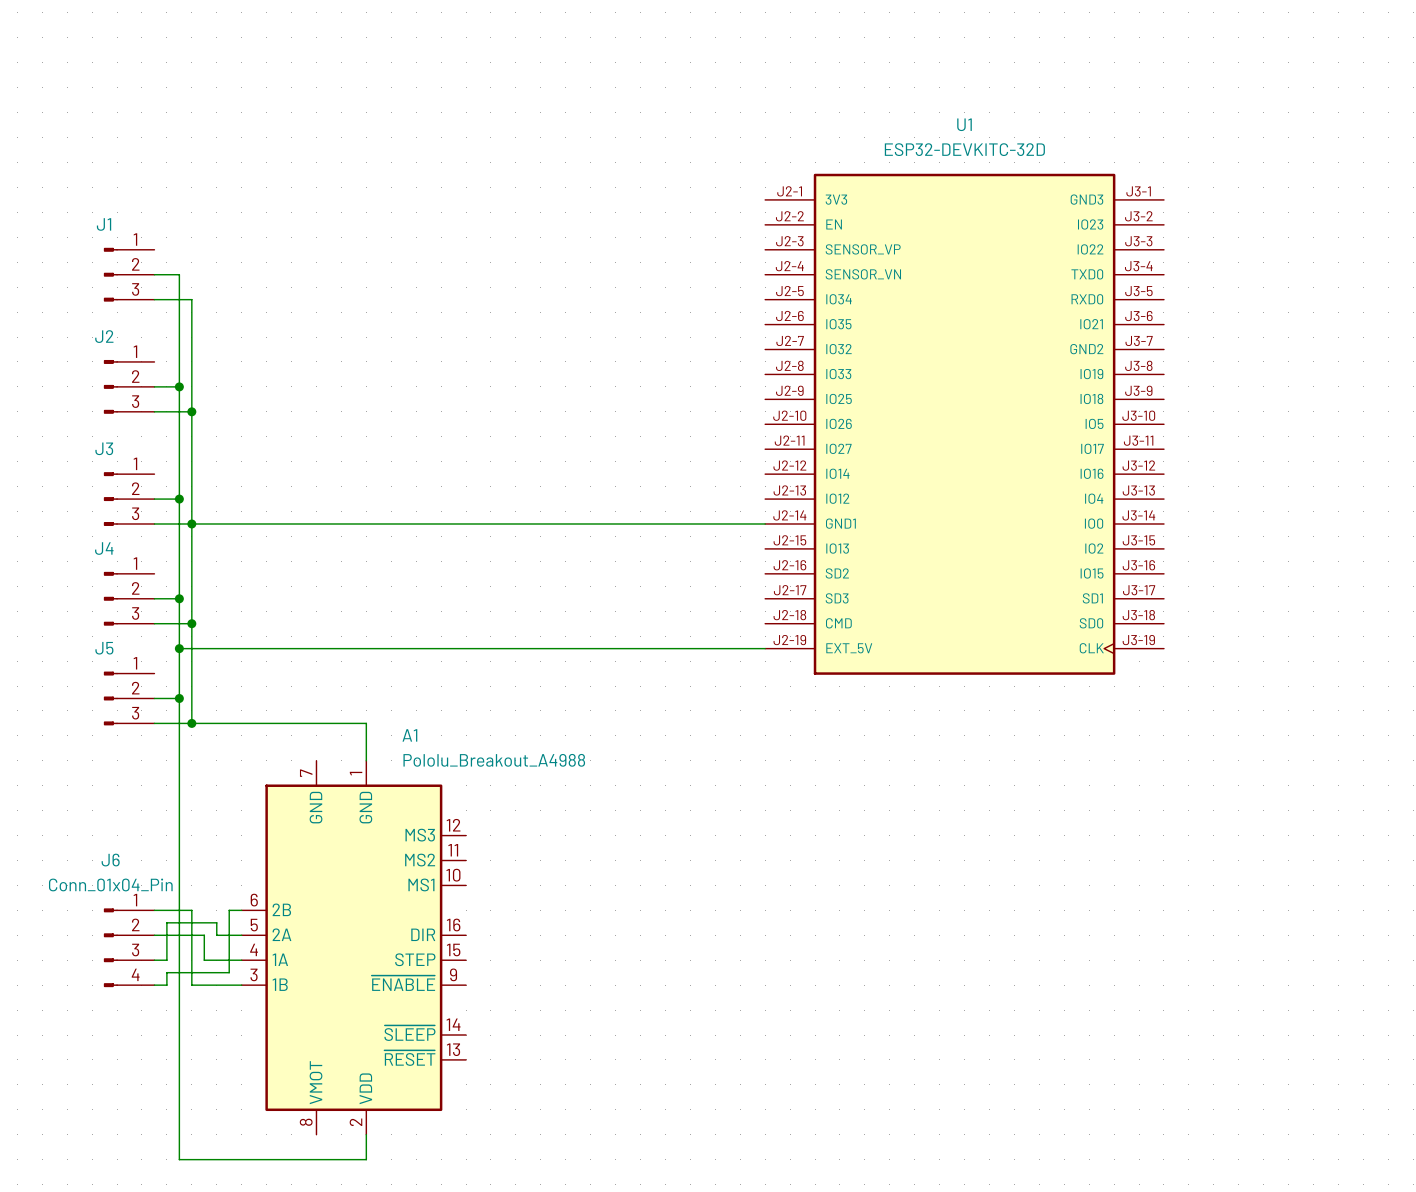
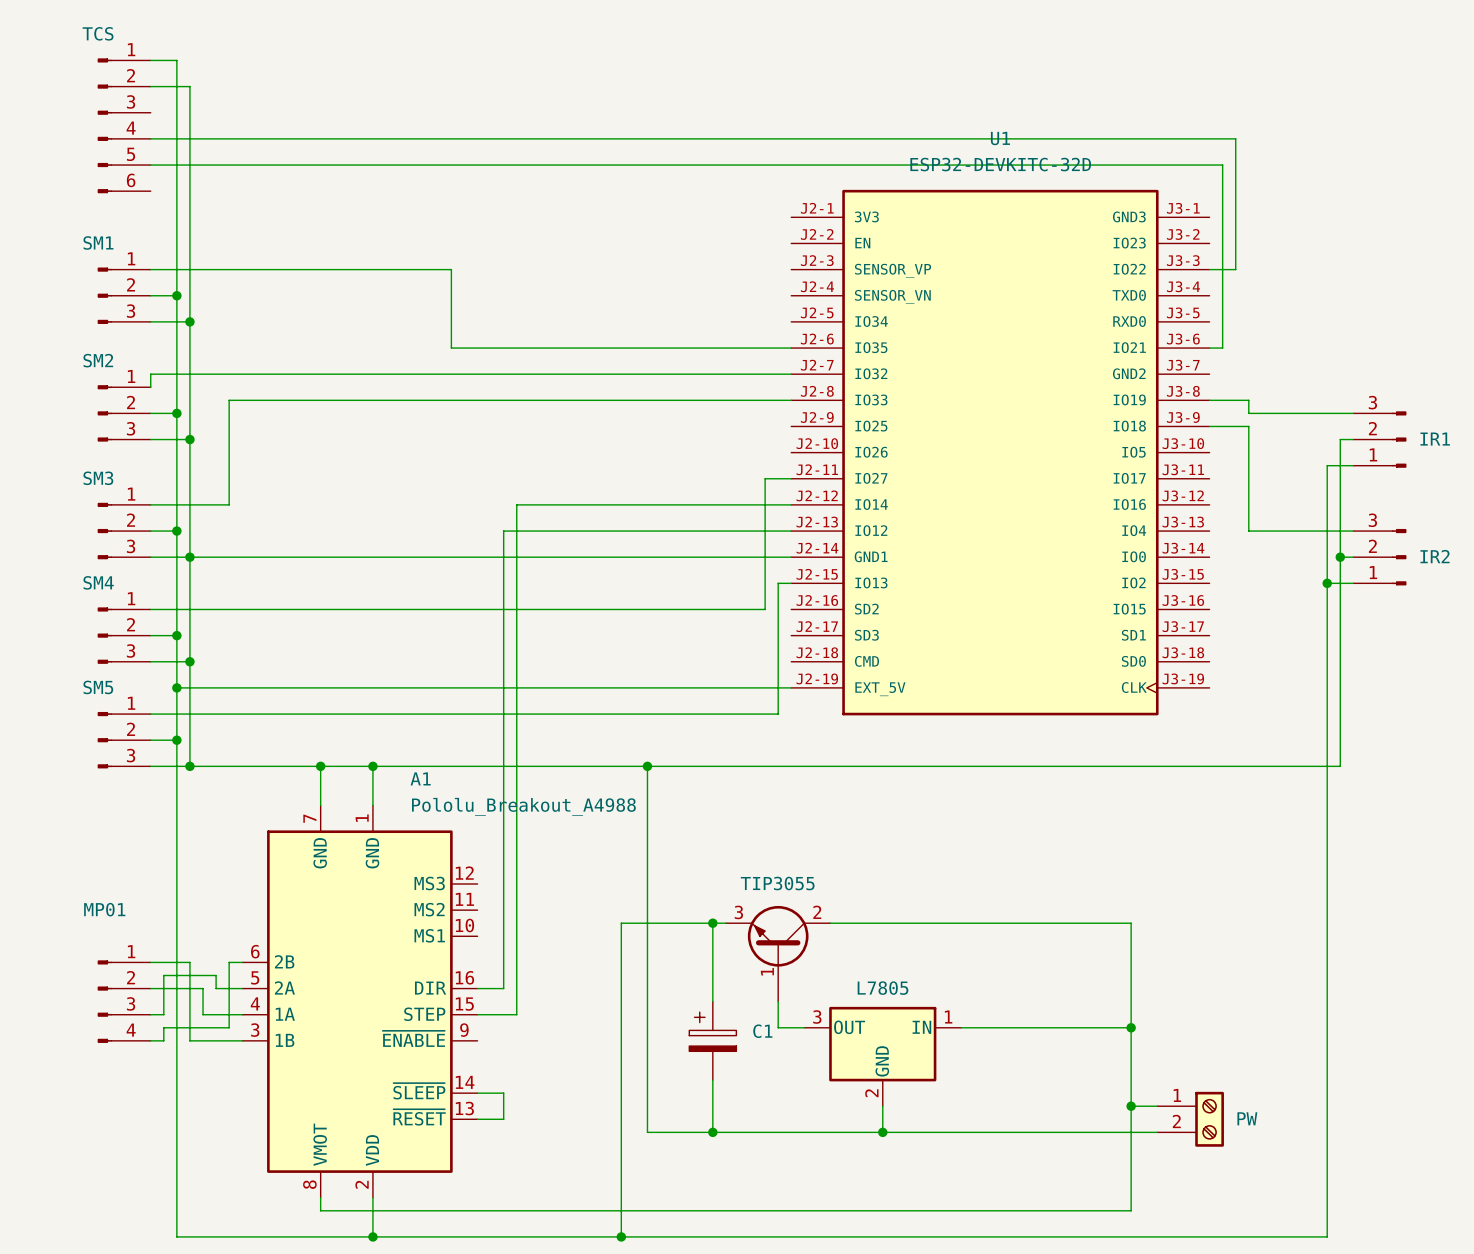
wire: none -> (150, 60) (176, 60) (176, 295)
wire: none -> (150, 86) (189, 86) (189, 321)
TCS: none -> (124, 125)
wire: none -> (150, 138) (1235, 138) (1235, 269) (1209, 269)
wire: none -> (150, 165) (1222, 165) (1222, 348) (1209, 348)
J1 name: J1 (104, 224) -> SM1 (98, 242)
wire: none -> (150, 269) (451, 269) (451, 348) (791, 348)
junction: none -> (176, 295)
junction: none -> (189, 321)
J2 name: J2 (104, 336) -> SM2 (98, 360)
wire: none -> (791, 374) (150, 374) (150, 387)
wire: none -> (791, 400) (229, 400) (229, 504) (150, 504)
wire: none -> (1209, 400) (1248, 400) (1248, 413) (1353, 413)
wire: none -> (1209, 426) (1248, 426) (1248, 531) (1353, 531)
wire: none -> (1353, 439) (1340, 439) (1340, 766) (372, 766)
IR1: none -> (1379, 439)
wire: none -> (1353, 465) (1327, 465) (1327, 1236) (176, 1236) (176, 1223)
J3 name: J3 (104, 448) -> SM3 (98, 478)
wire: none -> (791, 478) (765, 478) (765, 609) (150, 609)
wire: none -> (791, 504) (516, 504) (516, 1014) (477, 1014)
wire: none -> (791, 531) (503, 531) (503, 988) (477, 988)
wire: none -> (1340, 557) (1353, 557)
junction: none -> (1340, 557)
IR2: none -> (1379, 557)
J4 name: J4 (104, 548) -> SM4 (98, 582)
wire: none -> (791, 583) (778, 583) (778, 714) (150, 714)
wire: none -> (1327, 583) (1353, 583)
junction: none -> (1327, 583)
J5 name: J5 (104, 648) -> SM5 (98, 687)
wire: none -> (320, 766) (320, 805)
junction: none -> (320, 766)
junction: none -> (372, 766)
wire: none -> (647, 766) (647, 1132) (1157, 1132)
junction: none -> (647, 766)
J6 name: J6 (110, 860) -> MP01 (104, 909)
wire: none -> (712, 923) (712, 1001)
junction: none -> (712, 923)
wire: none -> (725, 923) (621, 923) (621, 1236)
wire: none -> (830, 923) (1131, 923) (1131, 1210) (320, 1210) (320, 1197)
J6 value: Conn_01x04_Pin (110, 884) -> none
TIP3055: none -> (778, 953)
wire: none -> (778, 1001) (778, 1027) (804, 1027)
wire: none -> (961, 1027) (1131, 1027)
junction: none -> (1131, 1027)
C1: none -> (712, 1040)
L7805: none -> (882, 1056)
wire: none -> (712, 1080) (712, 1132)
wire: none -> (477, 1093) (503, 1093) (503, 1119) (477, 1119)
wire: none -> (882, 1106) (882, 1132)
wire: none -> (1131, 1106) (1157, 1106)
junction: none -> (1131, 1106)
PW: none -> (1190, 1119)
junction: none -> (712, 1132)
junction: none -> (882, 1132)
wire: (179, 1159) (366, 1159) -> (372, 1236) (372, 1223)
junction: none -> (372, 1236)
junction: none -> (621, 1236)

